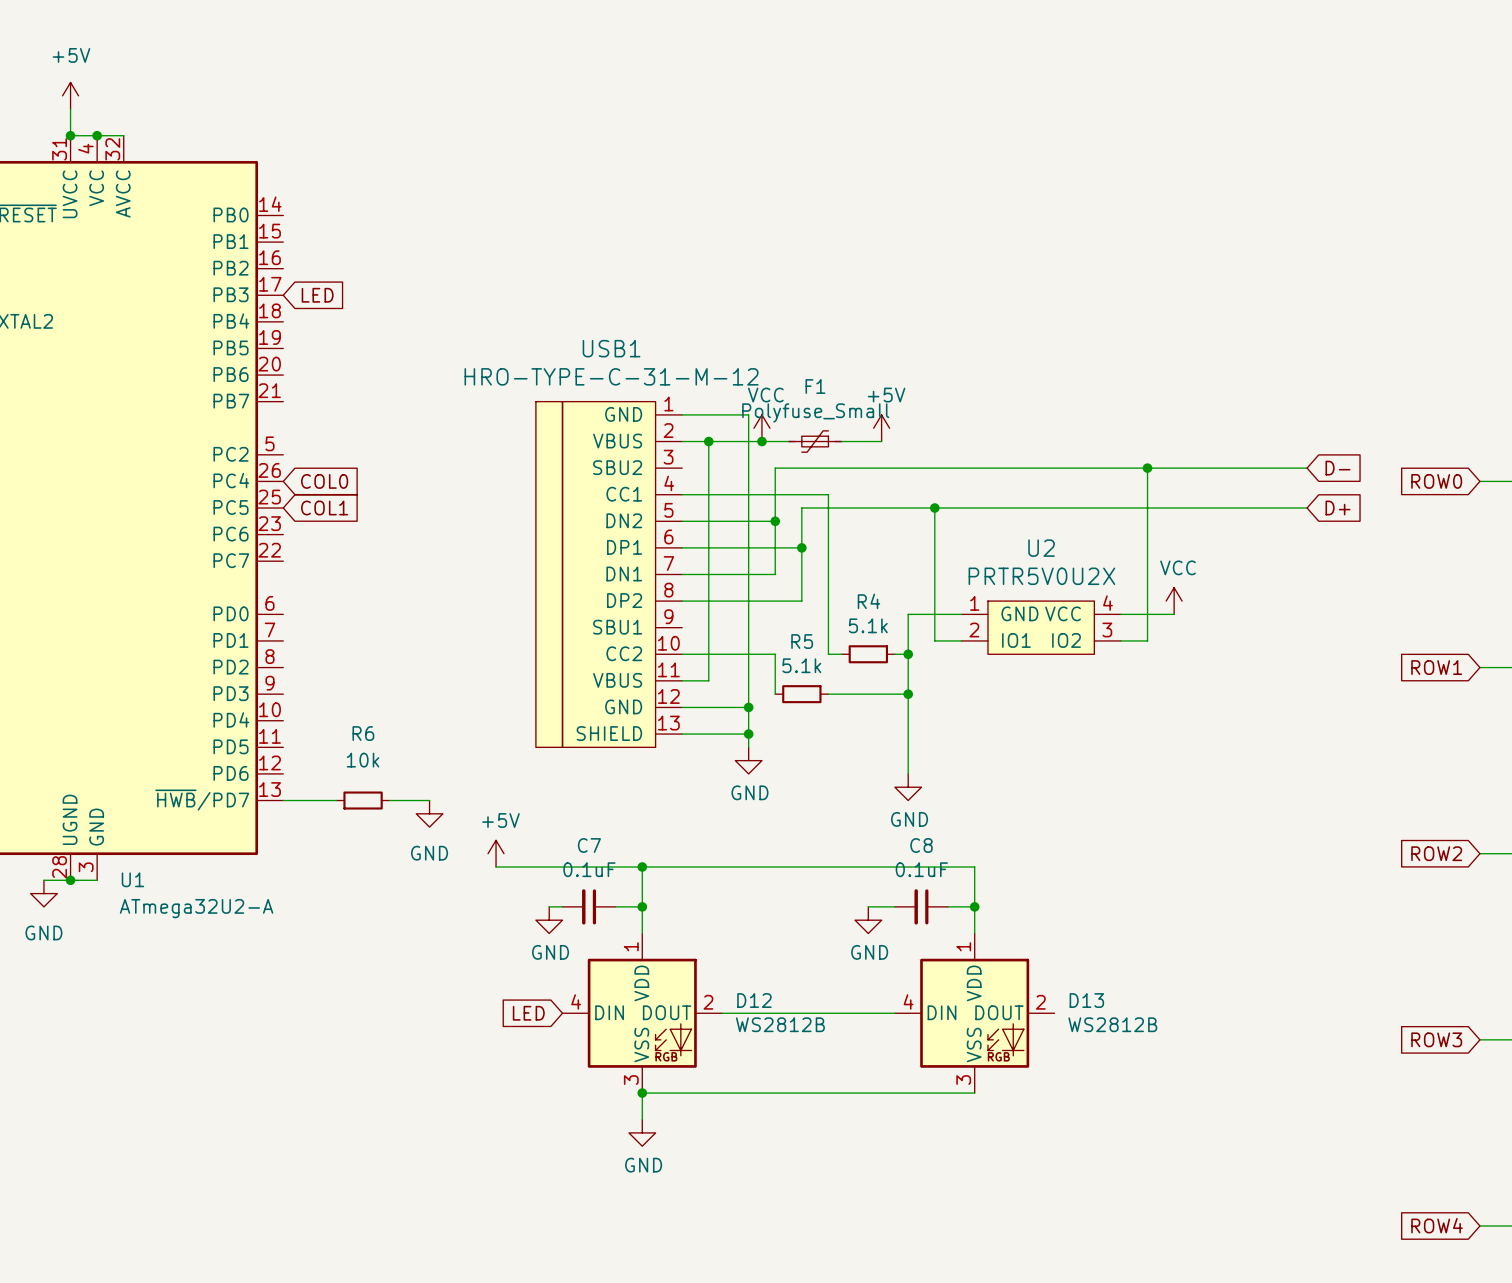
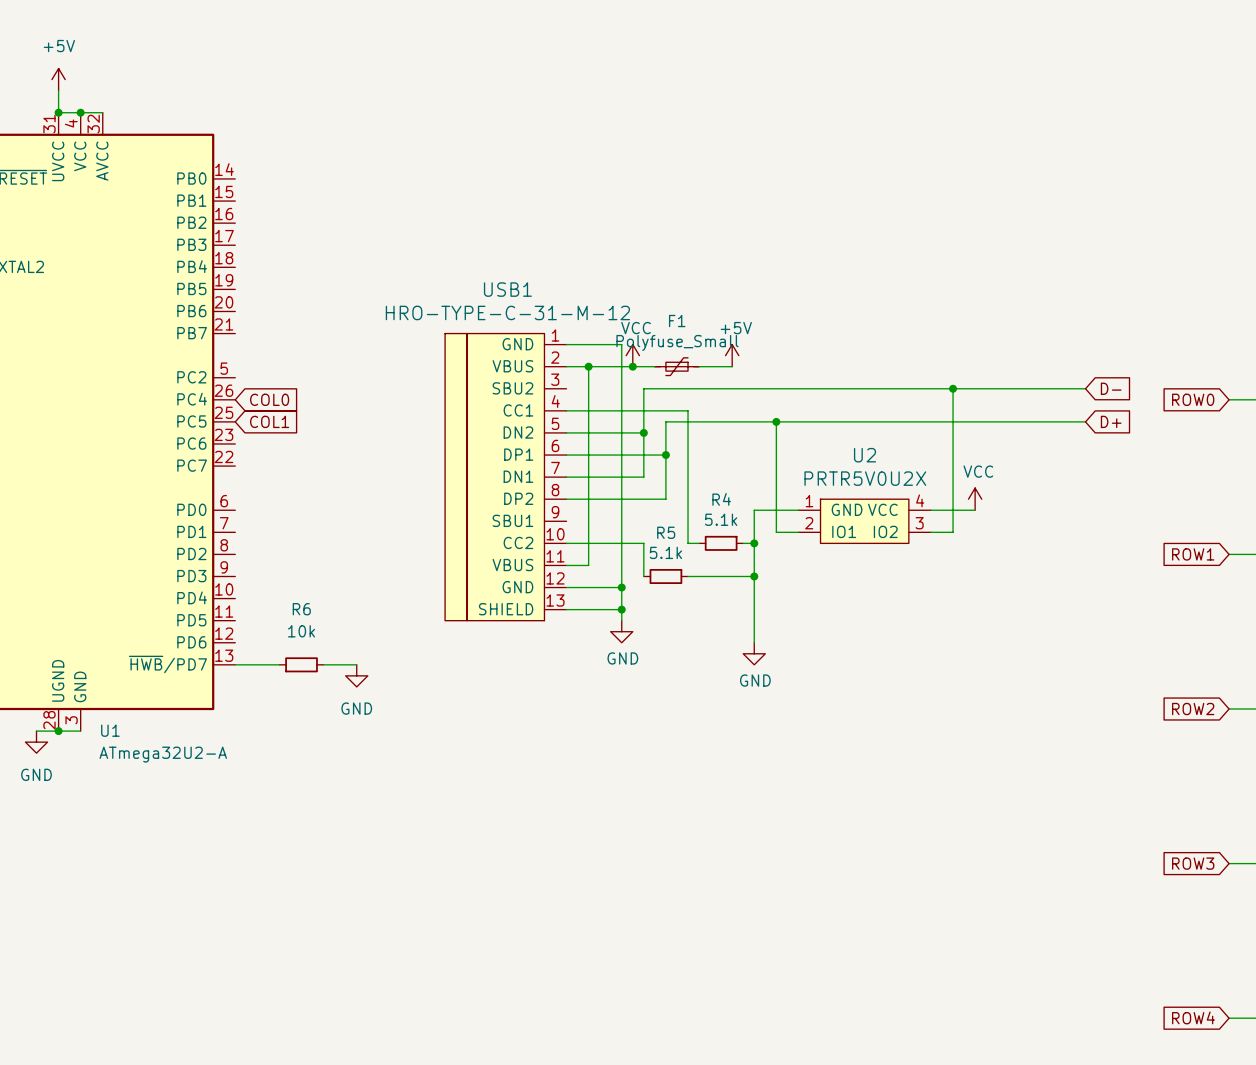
global label: LED (317, 295) -> none
power symbol: +5V (496, 853) -> none
wire: (496, 867) (974, 867) (974, 933) -> none
wire: (642, 867) (642, 933) -> none
junction: (642, 867) -> none
wire: (549, 906) (562, 906) -> none
C7: 0.1uF (589, 906) -> none
wire: (615, 906) (642, 906) -> none
junction: (642, 906) -> none
wire: (868, 906) (894, 906) -> none
C8: 0.1uF (921, 906) -> none
wire: (948, 906) (974, 906) -> none
junction: (974, 906) -> none
power symbol: GND (549, 920) -> none
power symbol: GND (868, 920) -> none
global label: LED (528, 1013) -> none
D12: WS2812B (642, 1013) -> none
wire: (722, 1013) (894, 1013) -> none
D13: WS2812B (974, 1013) -> none
junction: (642, 1093) -> none
wire: (974, 1093) (642, 1093) (642, 1119) -> none
power symbol: GND (642, 1132) -> none

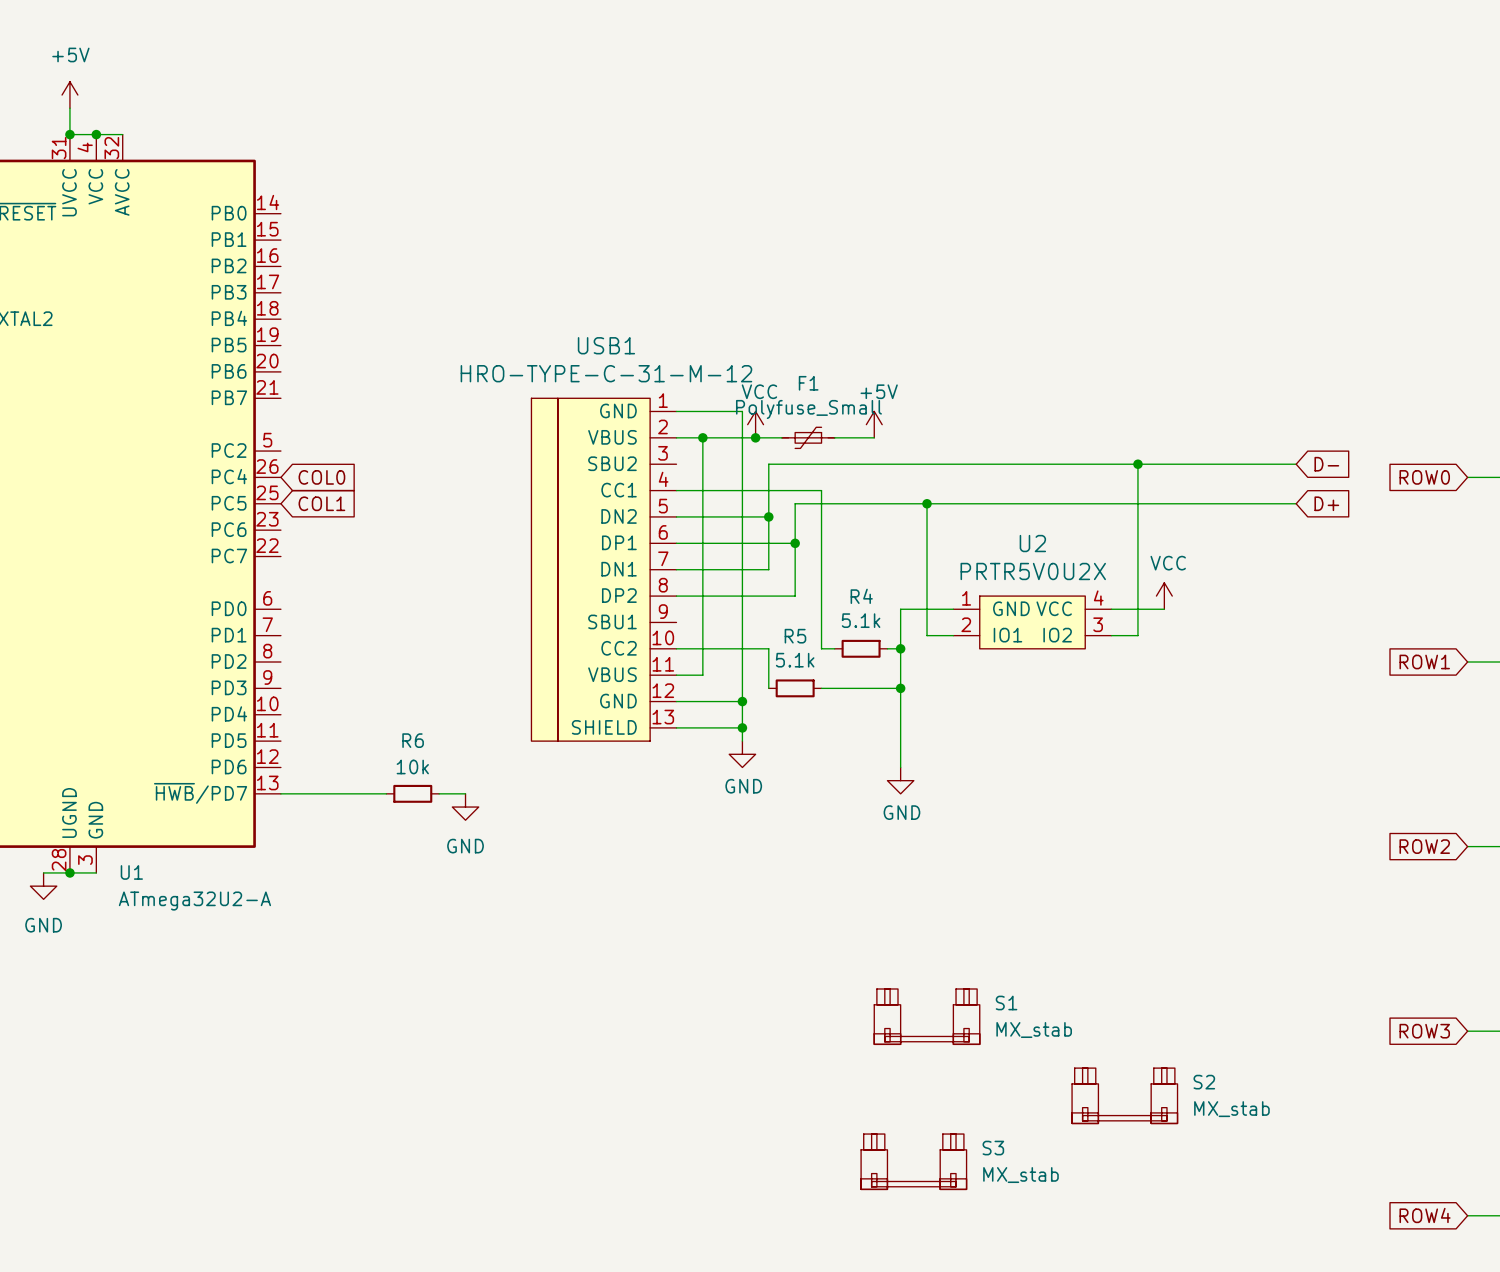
R6 name position: R6 (301, 609) -> R6 (413, 740)
R6 value position: 10k (301, 631) -> 10k (412, 766)
R6 position: (301, 664) -> (412, 793)
wire: (323, 664) (356, 664) -> (386, 793) (333, 793)
wire: none -> (439, 793) (465, 793)
power symbol position: GND (356, 675) -> GND (465, 807)
S1: none -> MX_stab (927, 1016)
S2: none -> MX_stab (1124, 1095)
S3: none -> MX_stab (913, 1161)

